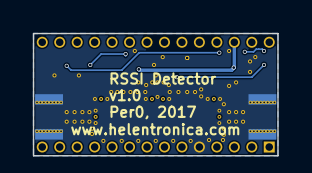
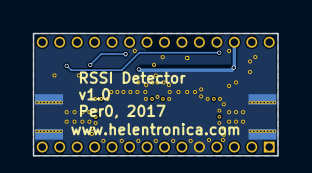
track: (264, 50) (256, 49) (253, 51) (244, 51) -> none
via: (264, 50) -> none
via: (244, 51) -> none
track: (264, 64) (251, 77) (176, 77) -> none
via: (264, 64) -> none
via: (176, 77) -> none
text position: RSSI Detector (163, 78) -> RSSI Detector (132, 77)
text position: v1.0 (125, 95) -> v1.0 (94, 94)
text position: Per0, 2017 (153, 112) -> Per0, 2017 (122, 111)

